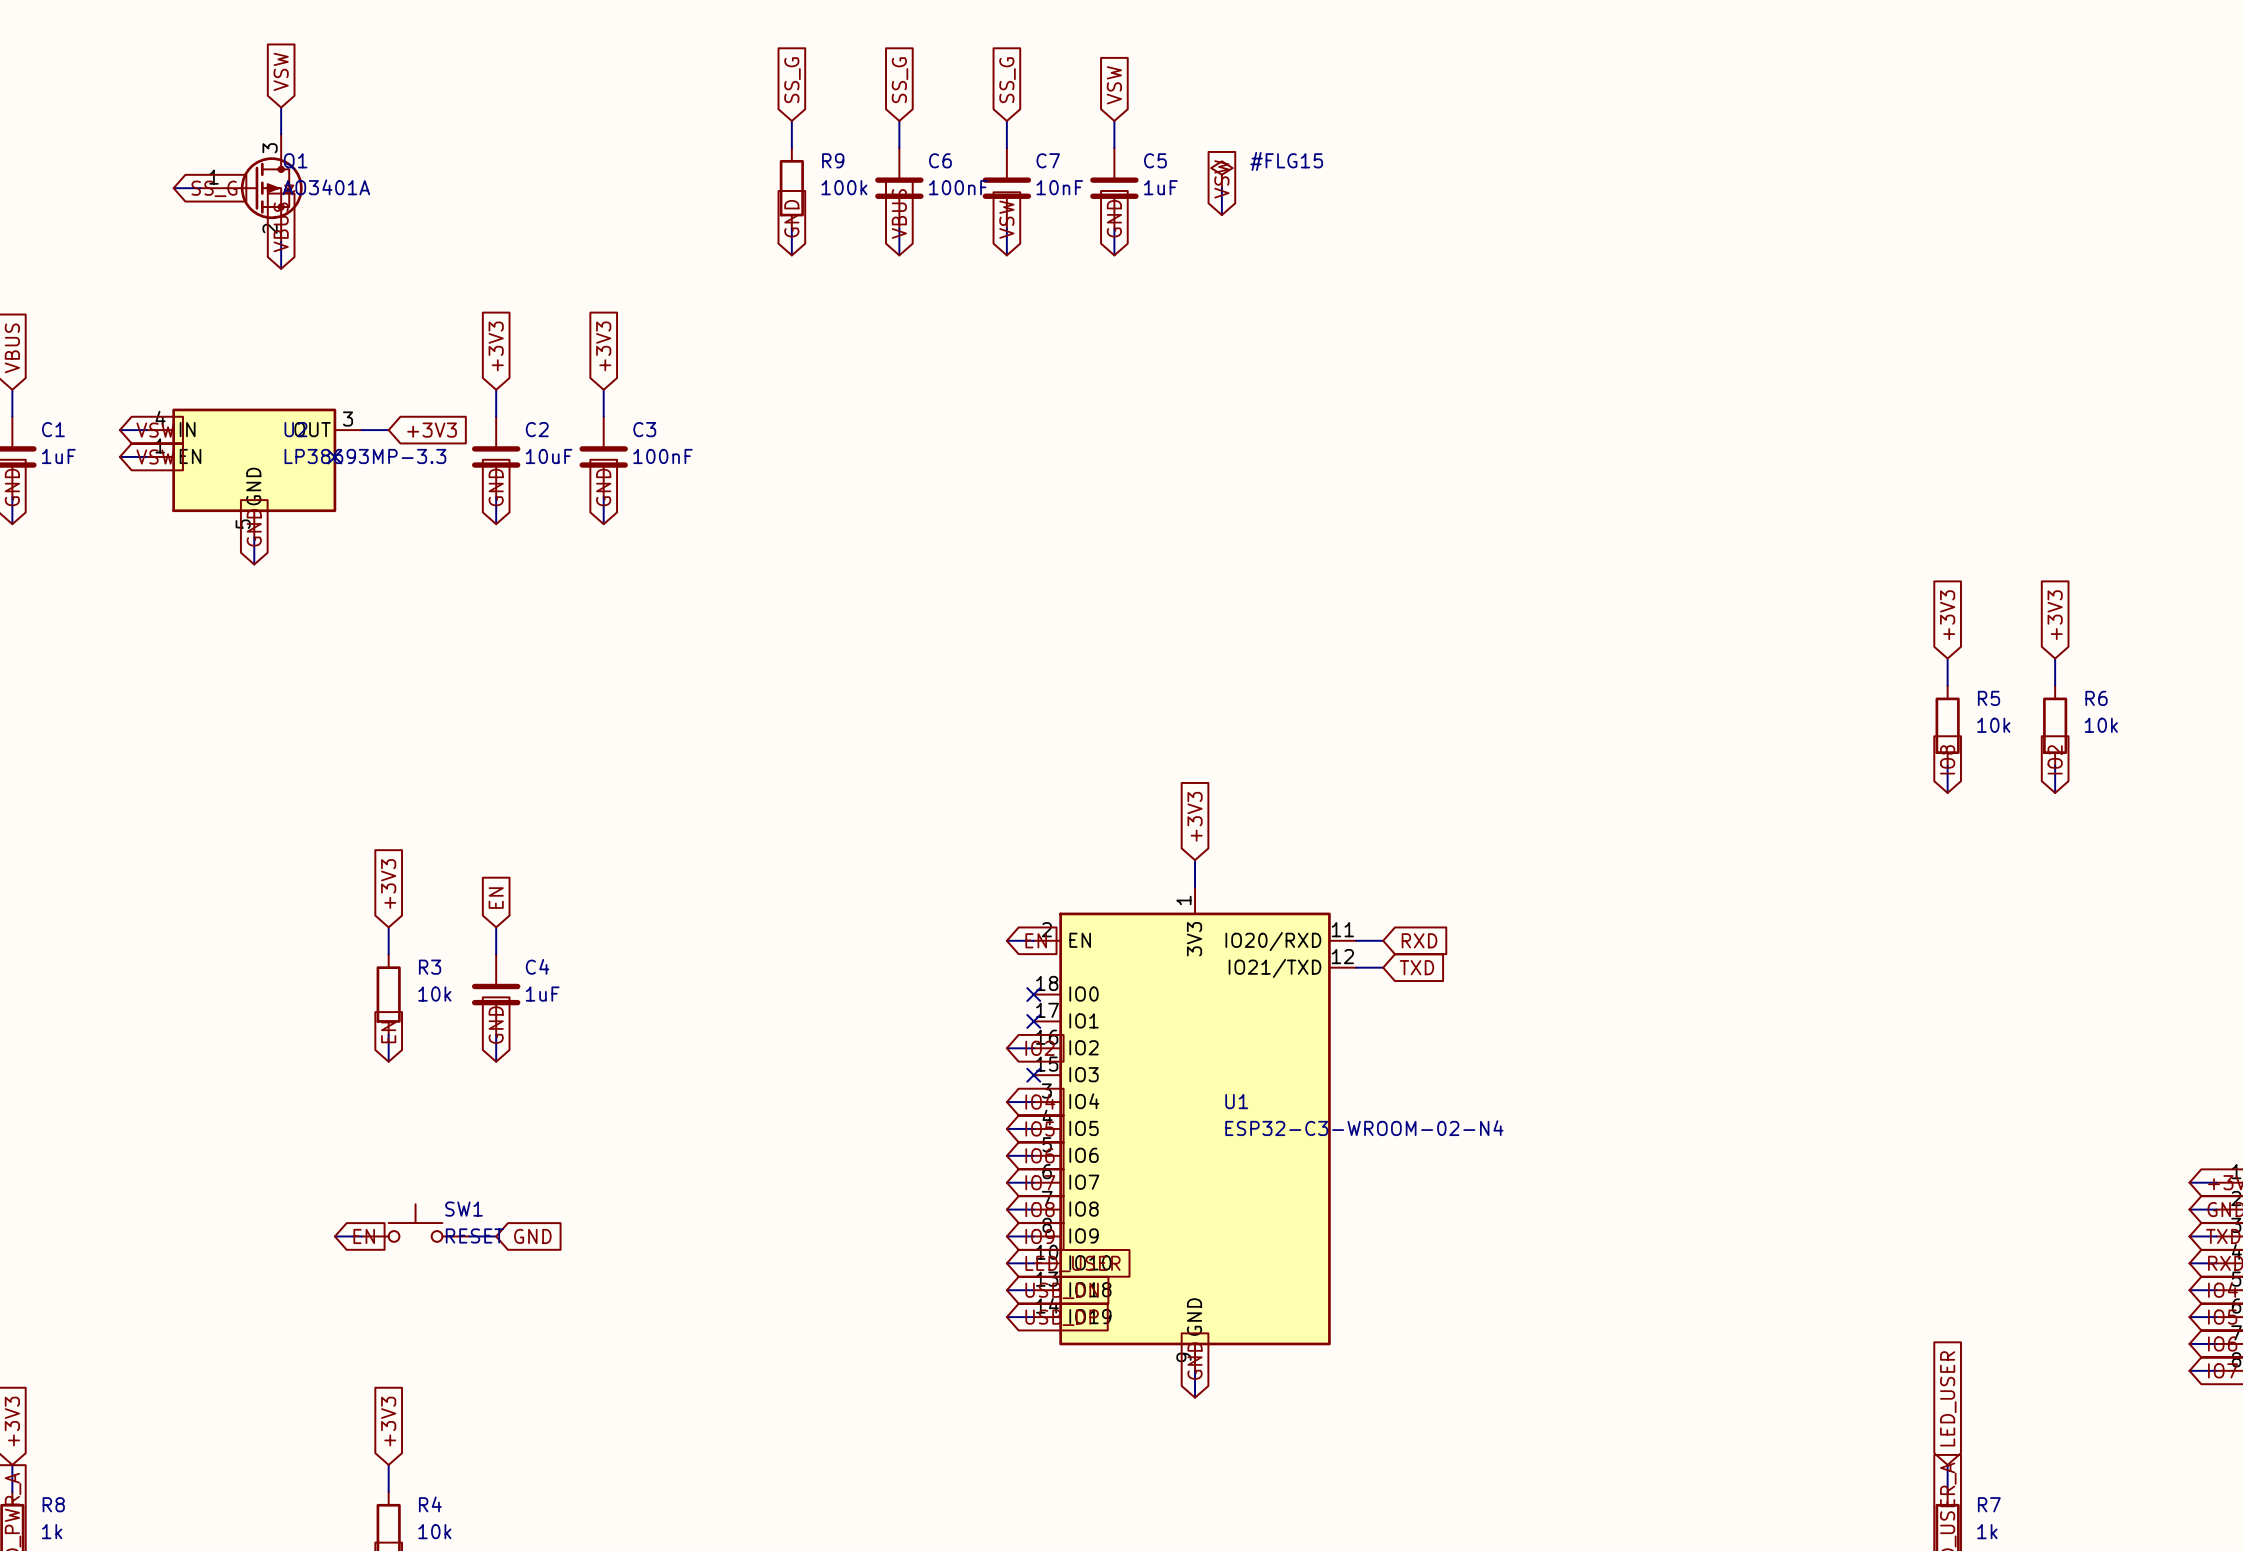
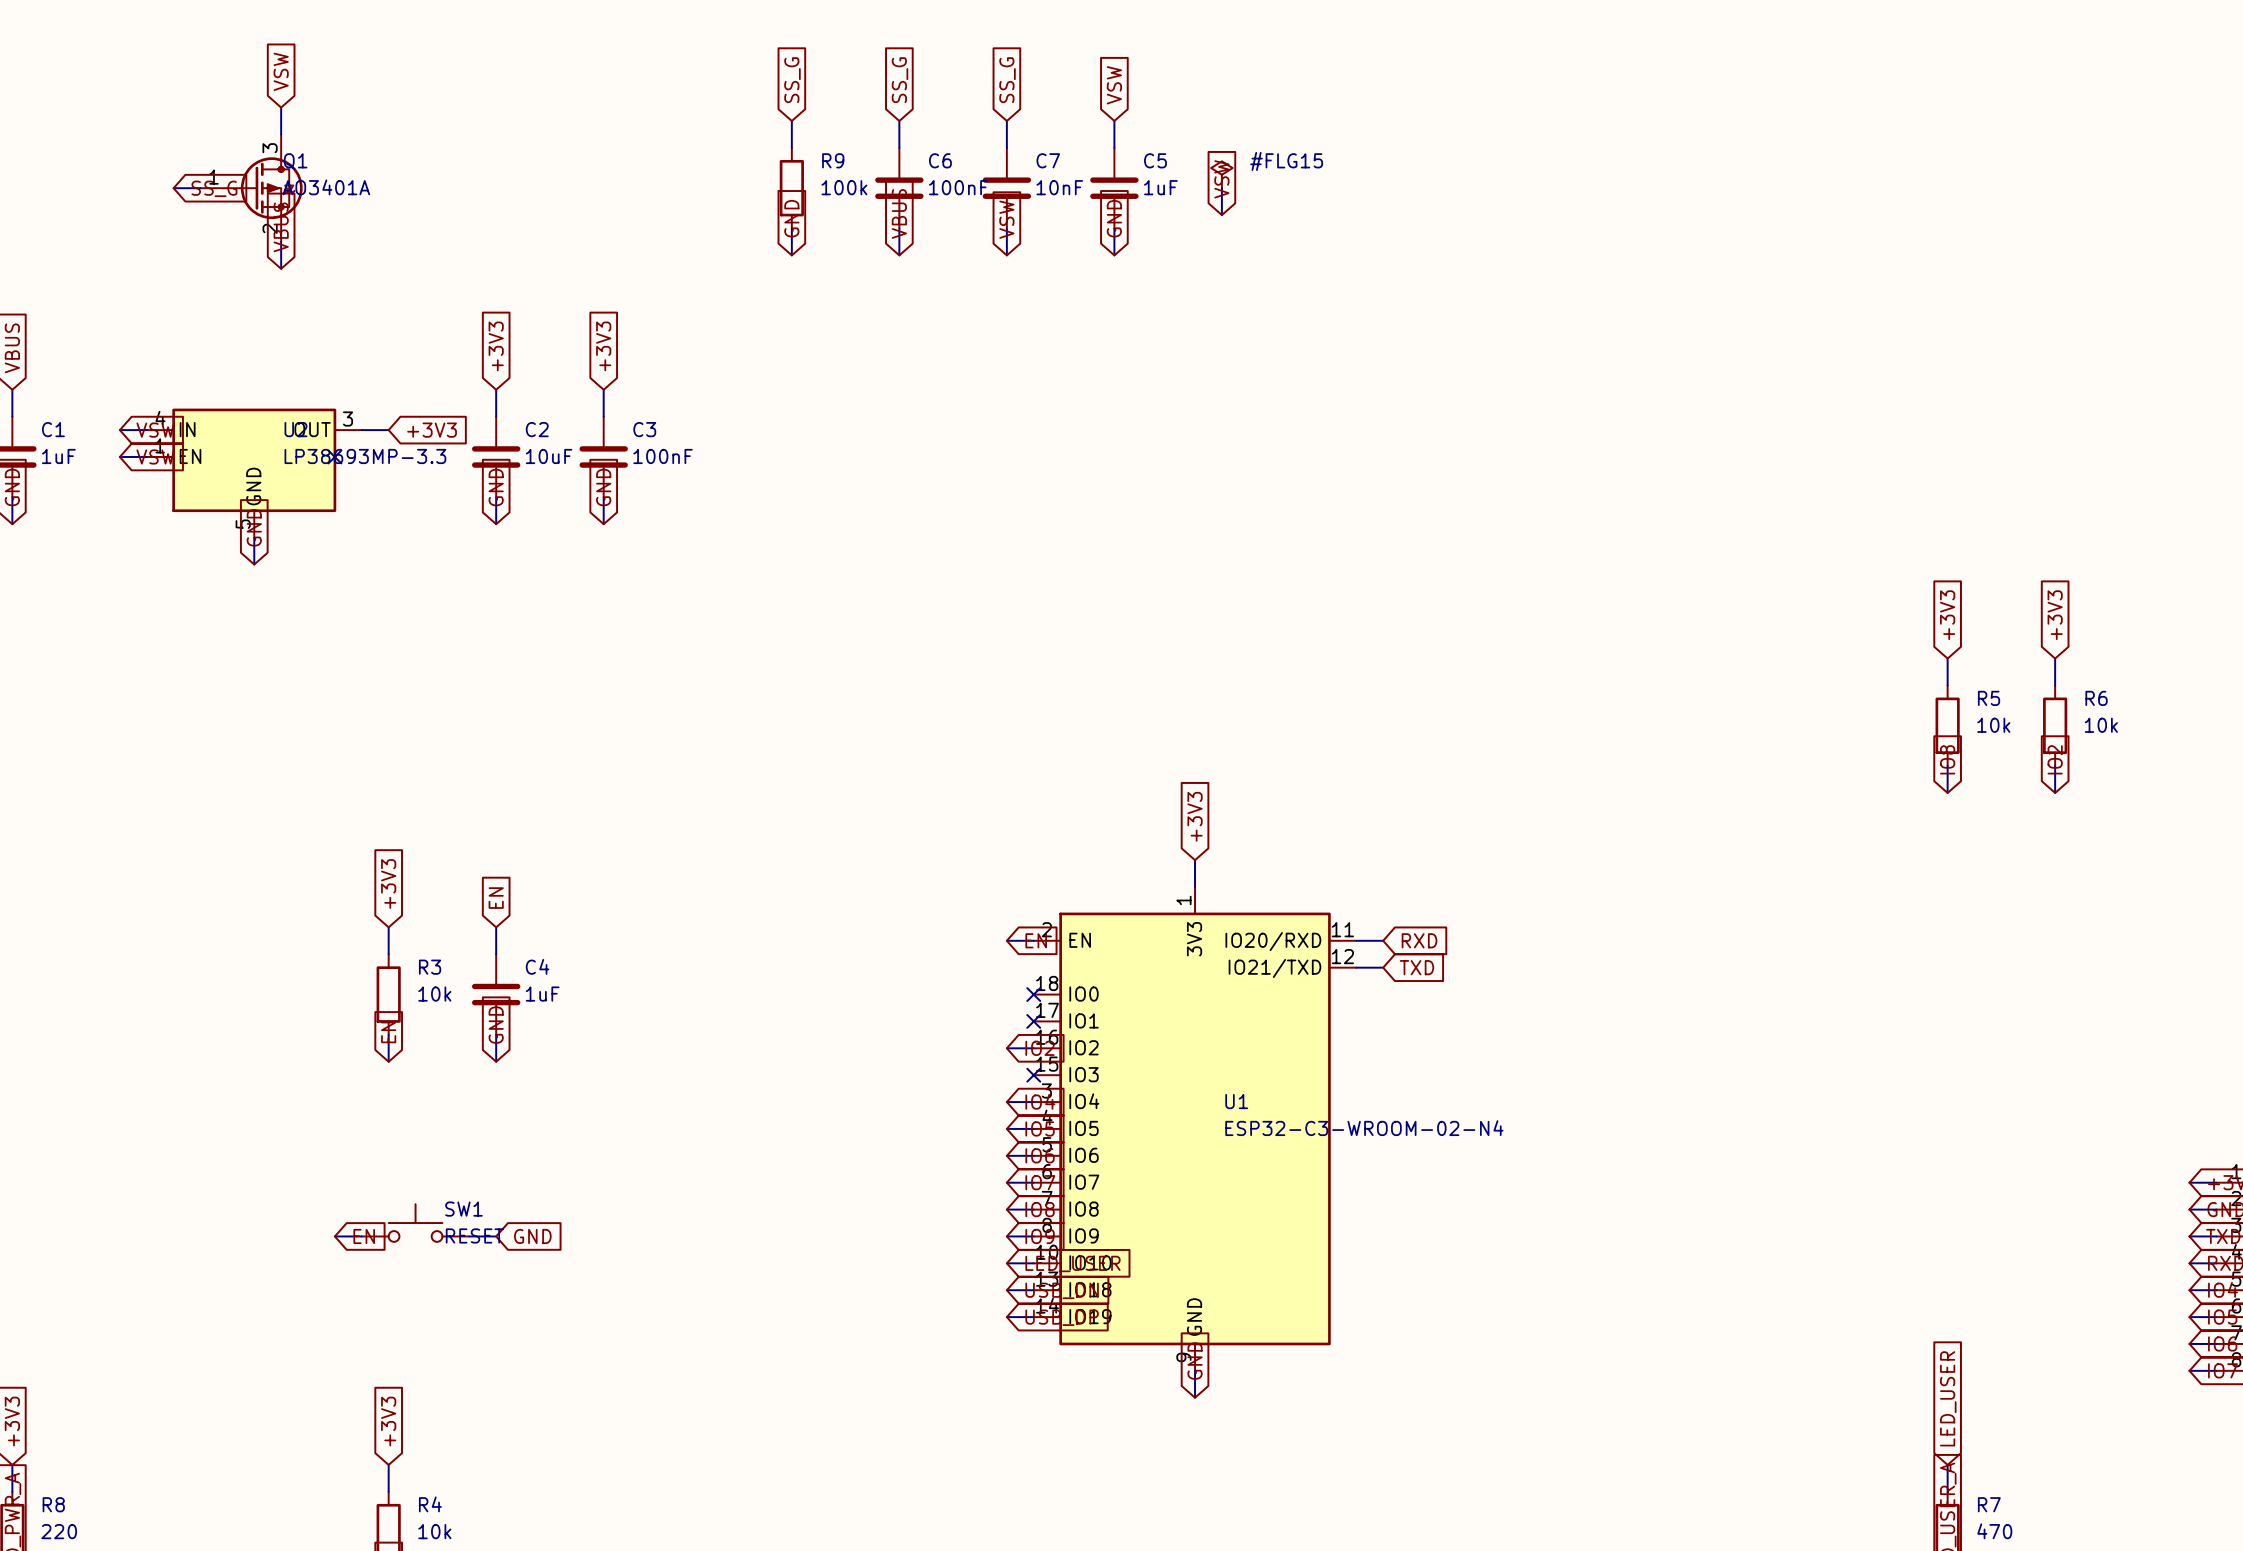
R8 value: 1k (52, 1531) -> 220 (59, 1531)
R7 value: 1k (1987, 1531) -> 470 (1994, 1531)

